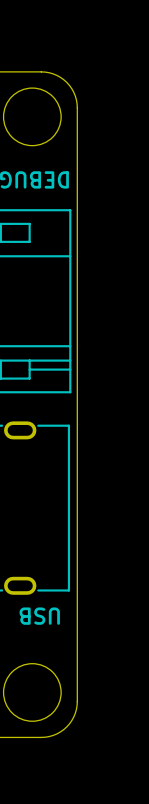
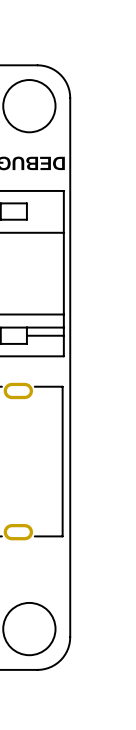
text: USB (39, 616) -> none

